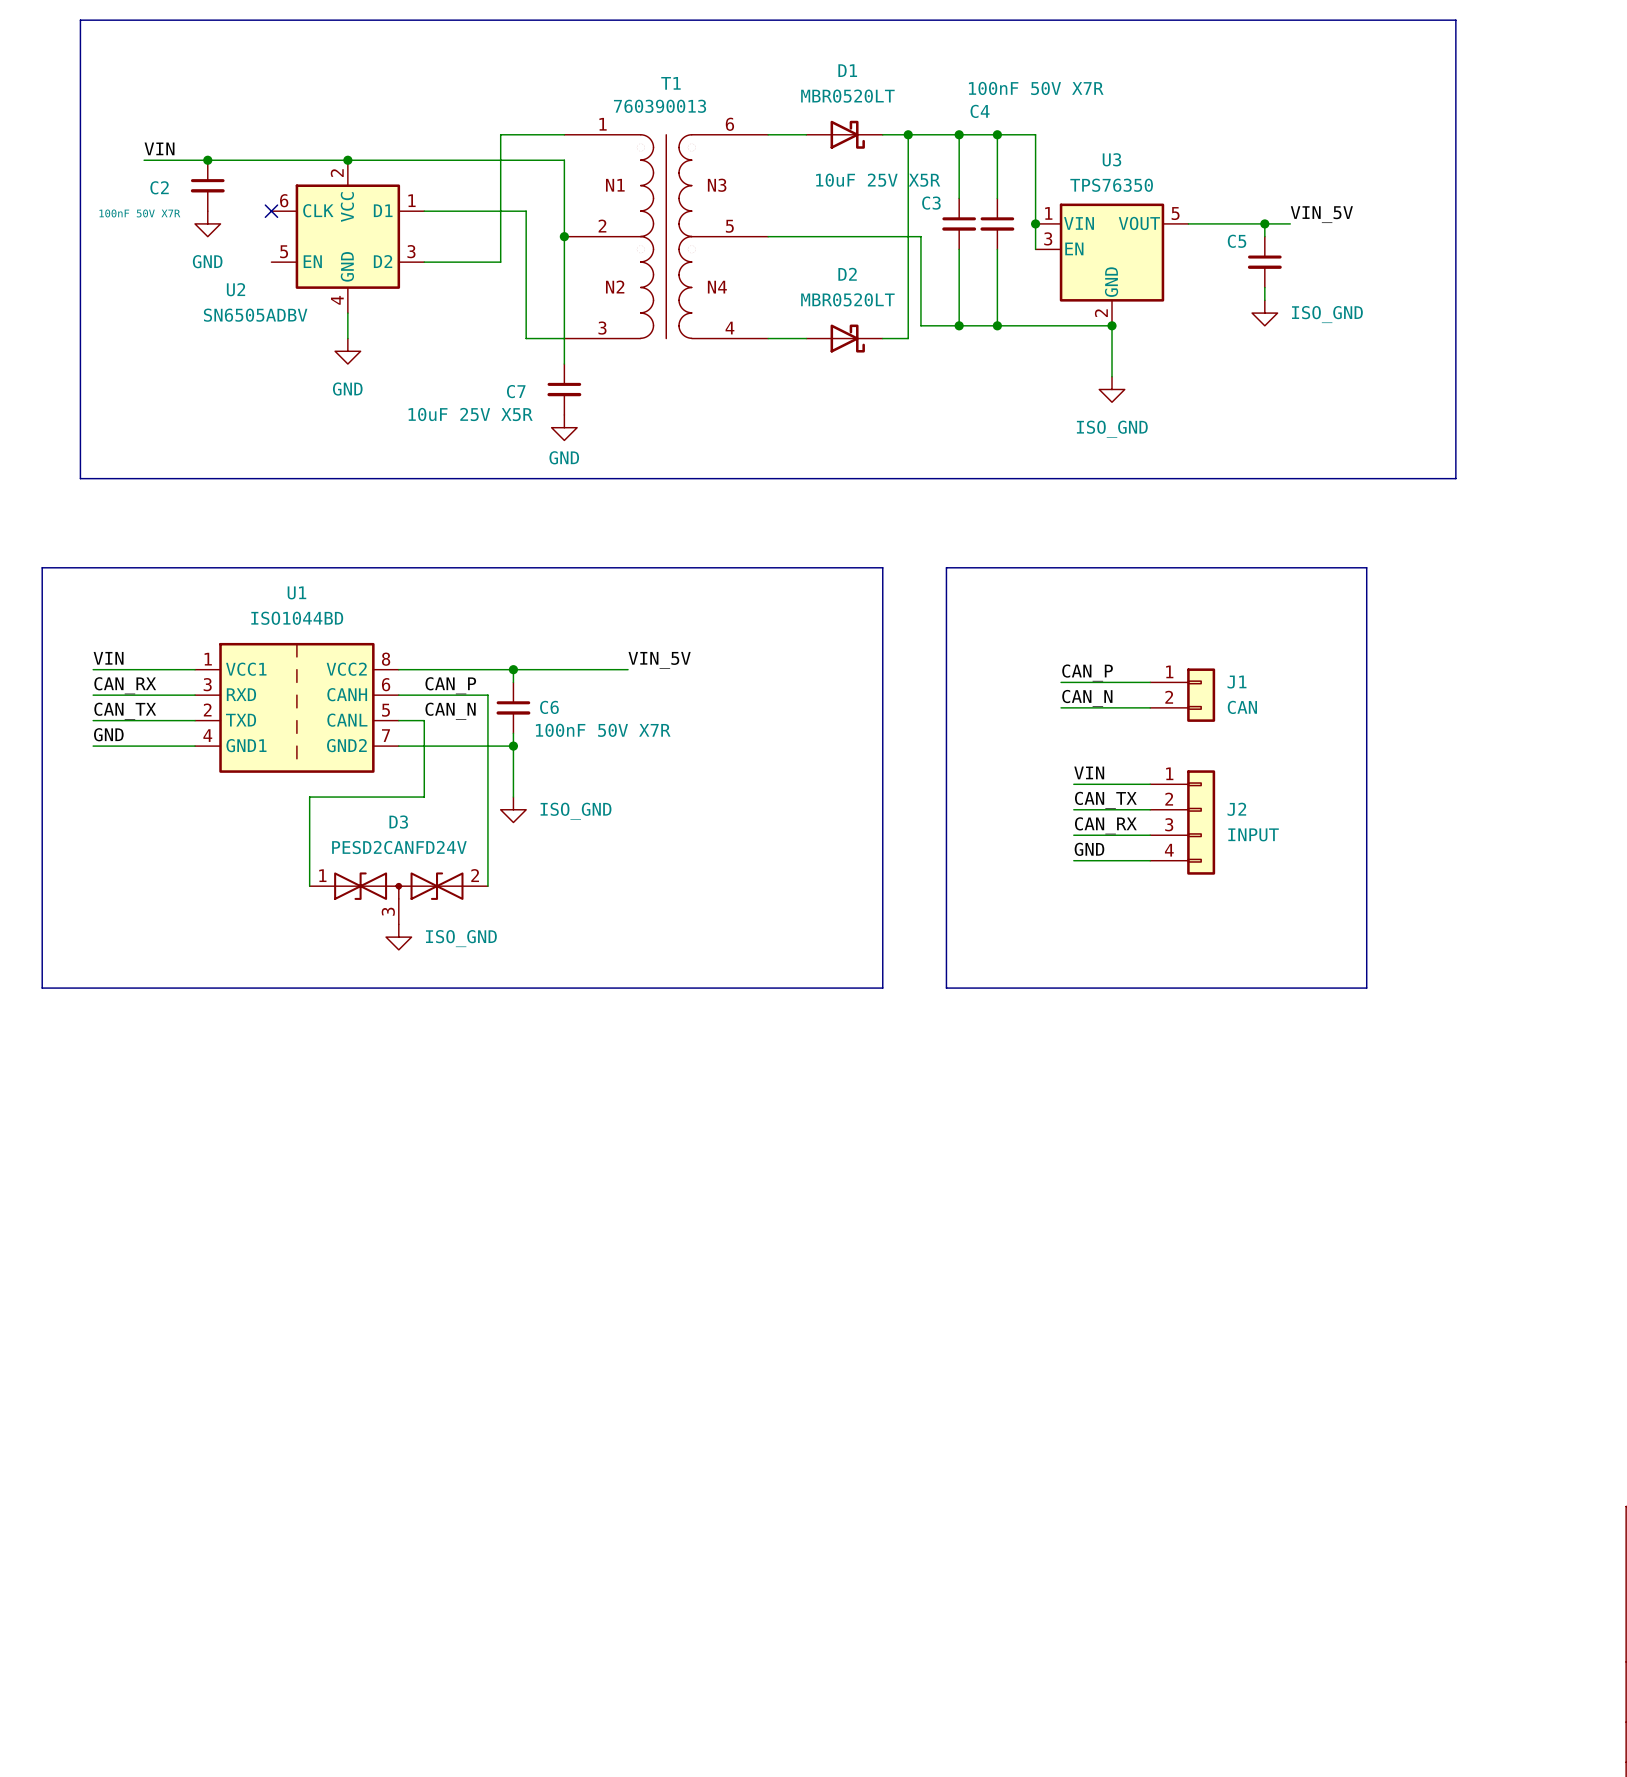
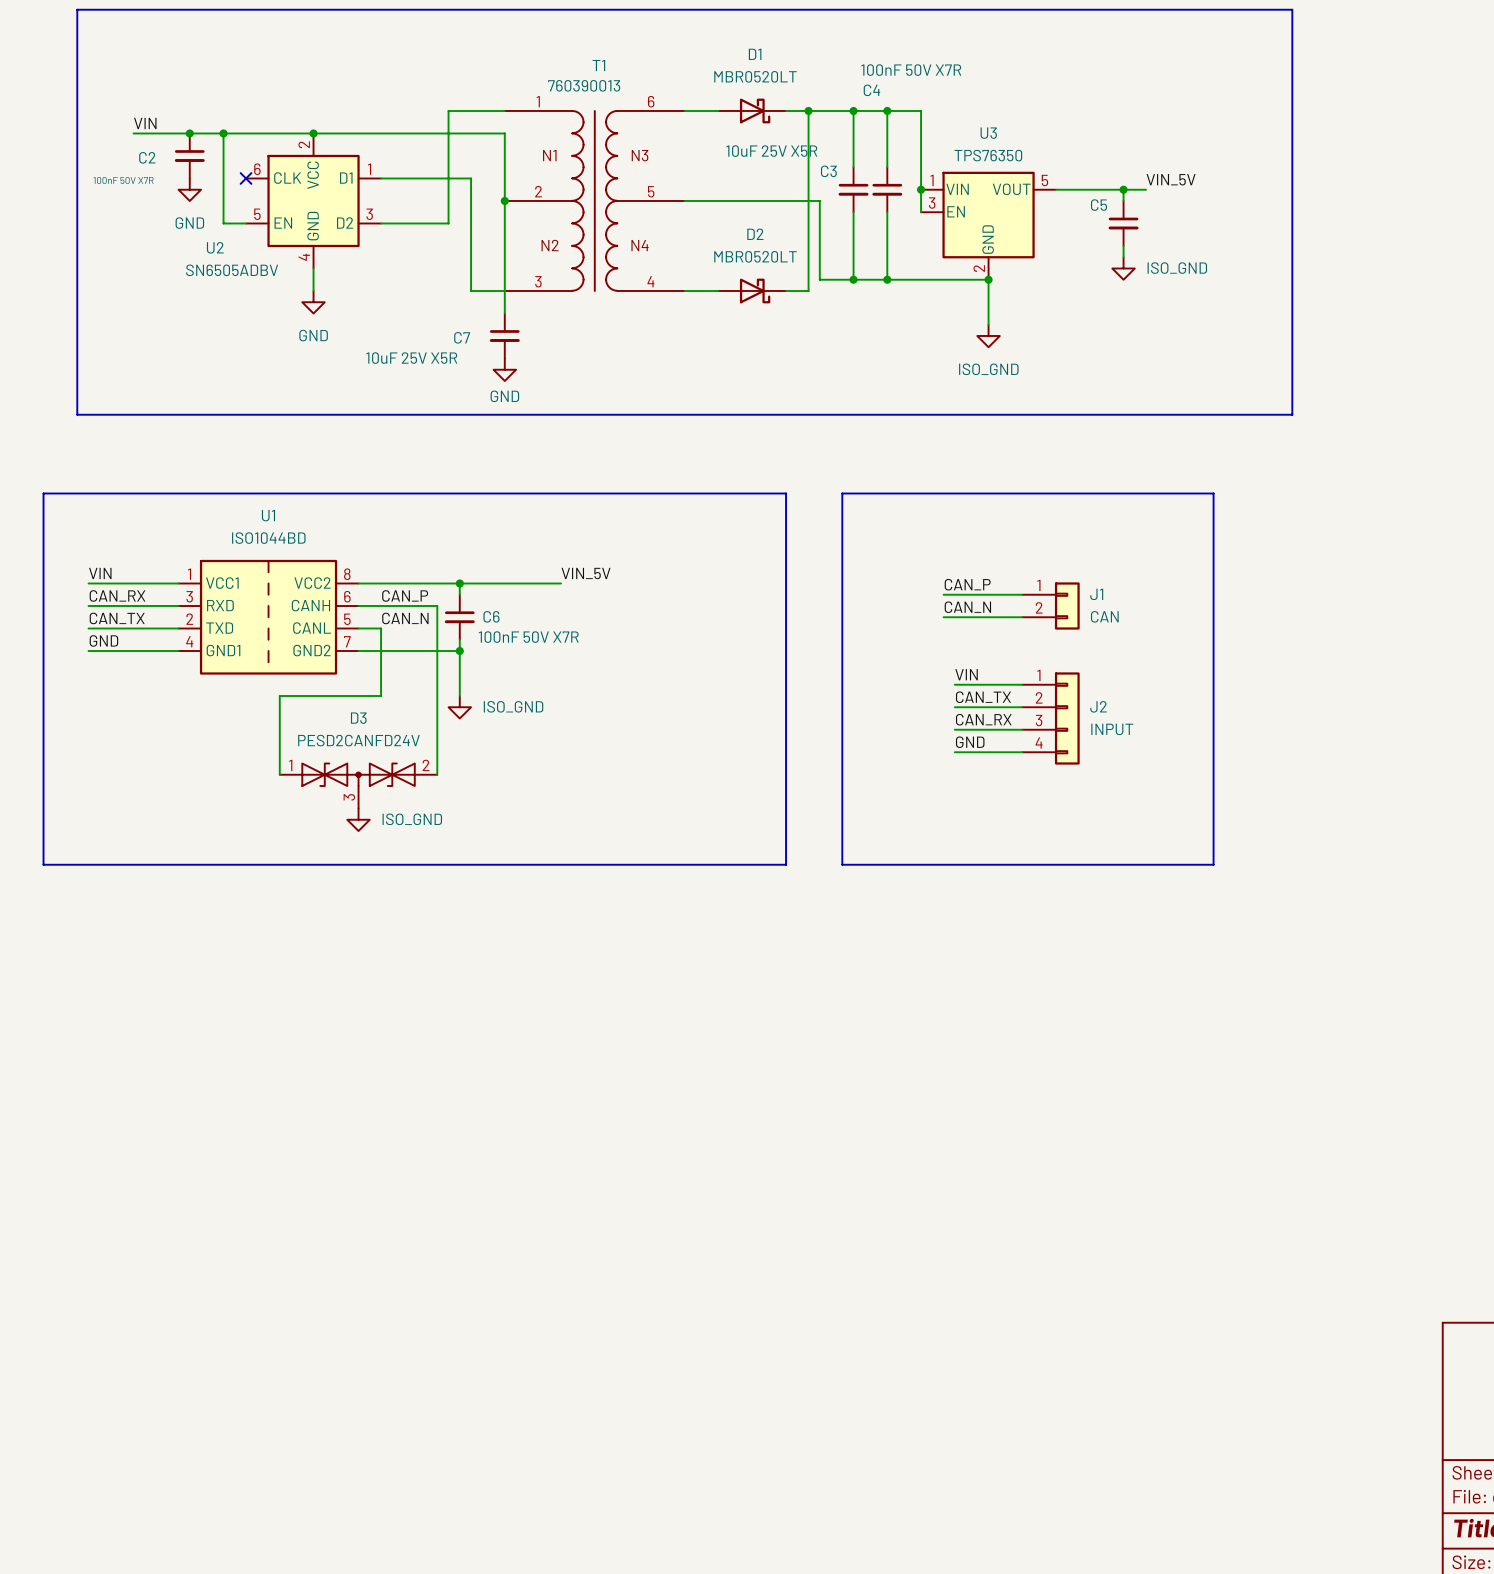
wire: none -> (223, 133) (223, 223) (246, 223)
junction: none -> (223, 133)

